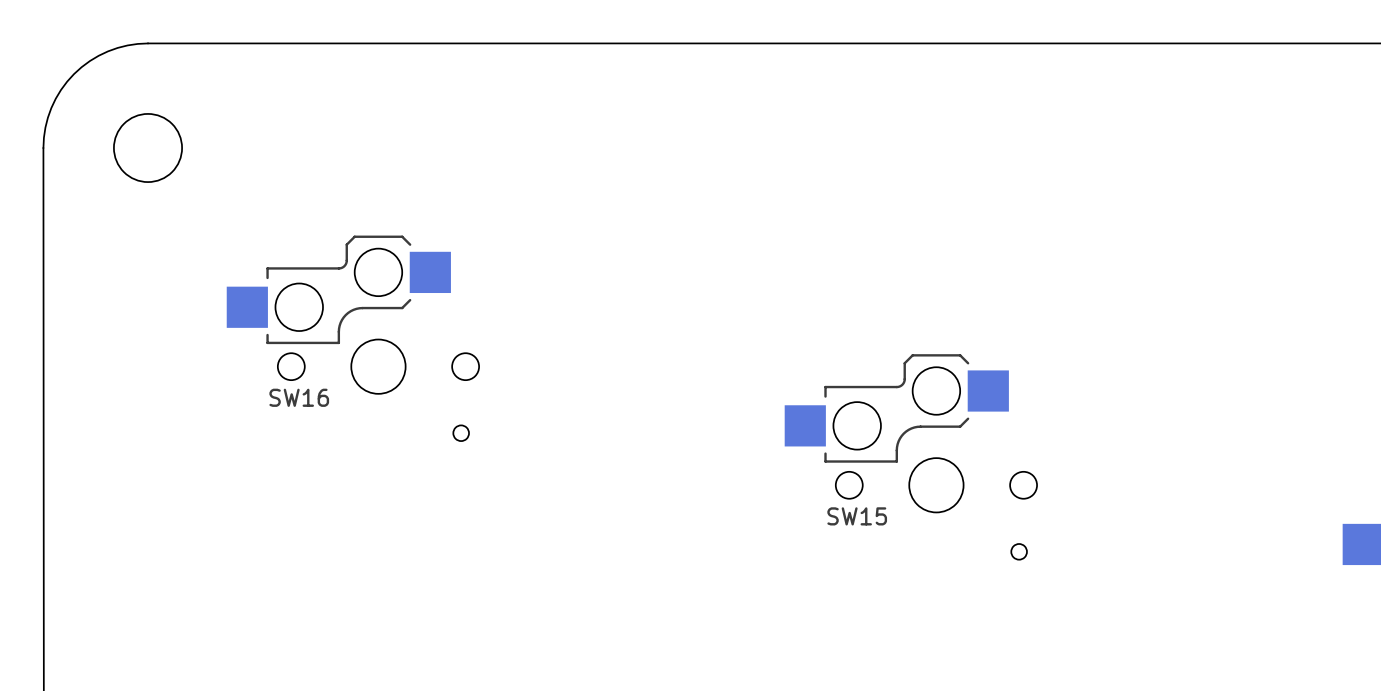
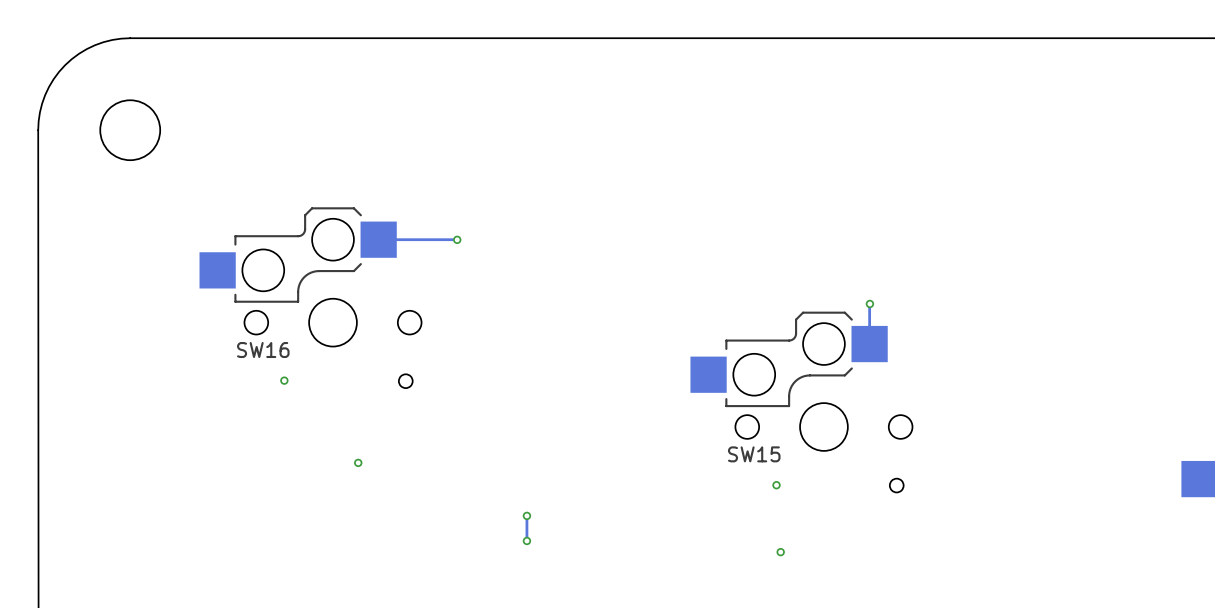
track: none -> (457, 239) (378, 239)
via: none -> (457, 239)
track: none -> (869, 303) (869, 344)
via: none -> (869, 303)
via: none -> (284, 380)
via: none -> (358, 462)
via: none -> (776, 485)
track: none -> (526, 515) (526, 540)
via: none -> (526, 515)
via: none -> (526, 540)
via: none -> (780, 552)

